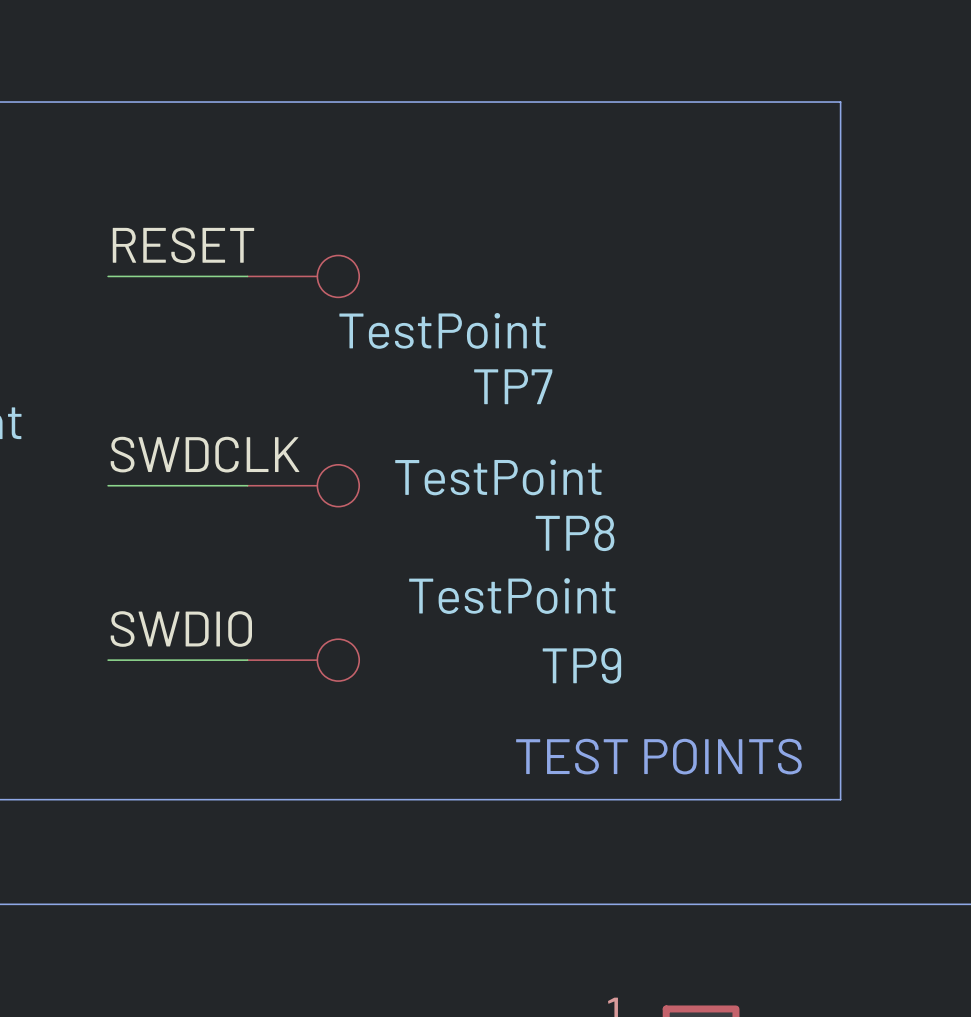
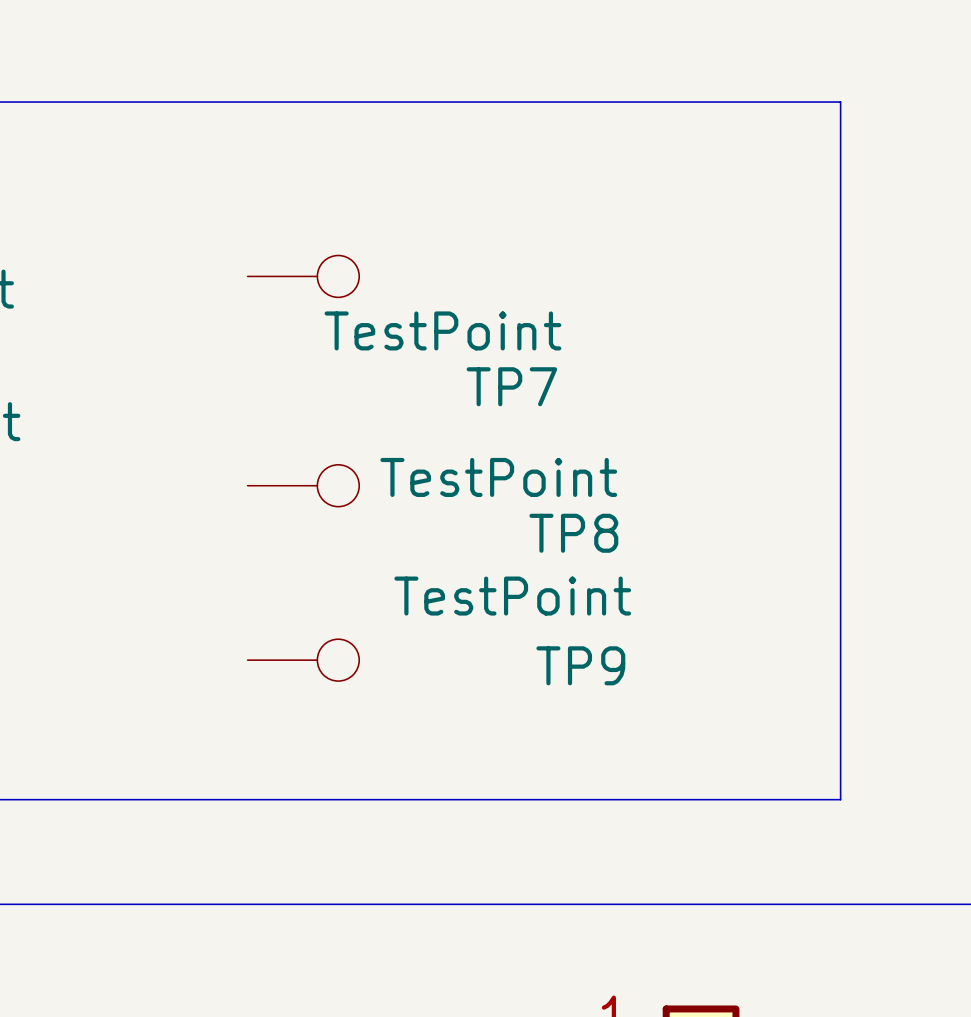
label: RESET (183, 245) -> none
wire: (108, 276) (247, 276) -> none
label: SWDCLK (205, 454) -> none
wire: (108, 485) (247, 485) -> none
label: SWDIO (181, 629) -> none
wire: (108, 660) (247, 660) -> none
text: TEST POINTS (658, 756) -> none

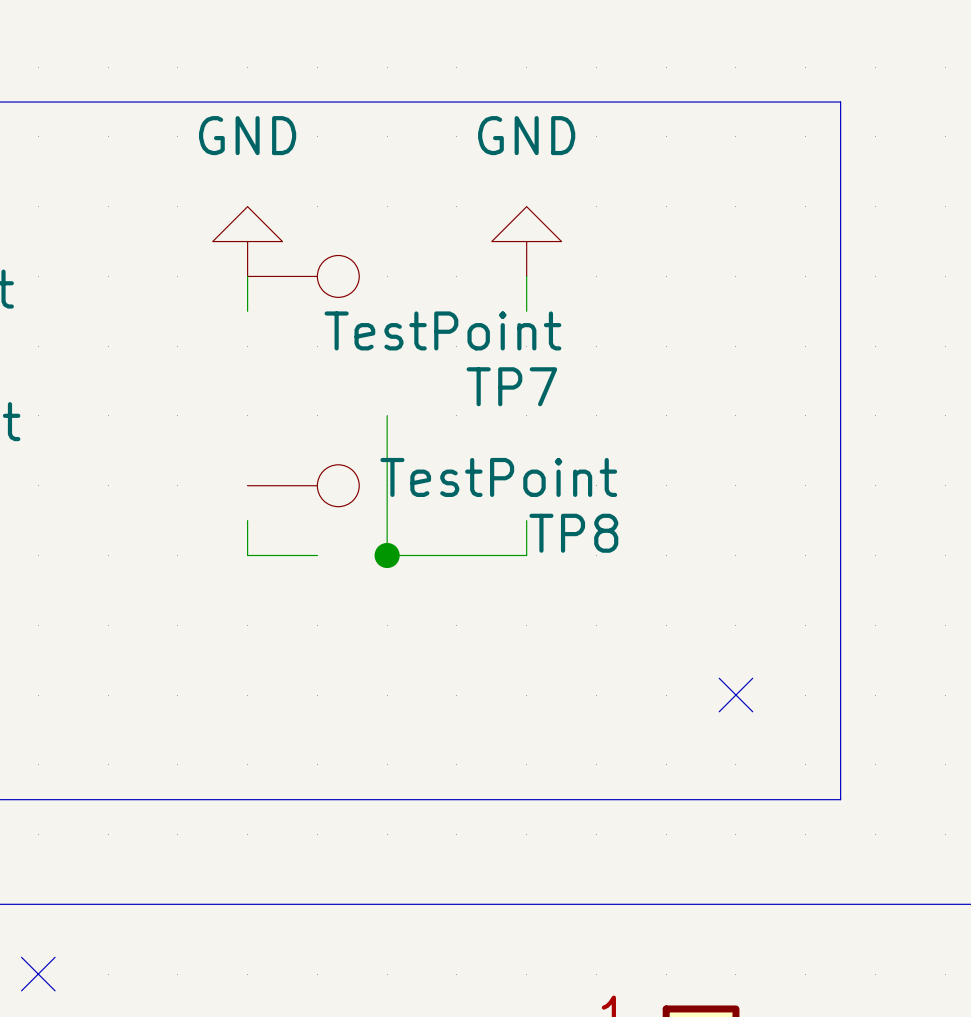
power symbol: none -> GND (247, 241)
power symbol: none -> GND (526, 241)
wire: none -> (247, 276) (247, 311)
wire: none -> (526, 276) (526, 311)
wire: none -> (387, 415) (387, 555) (526, 555) (526, 520)
wire: none -> (247, 520) (247, 555) (317, 555)
junction: none -> (387, 555)
TP9: TestPoint (303, 660) -> none
no-connect mark: none -> (735, 695)
no-connect mark: none -> (38, 974)

